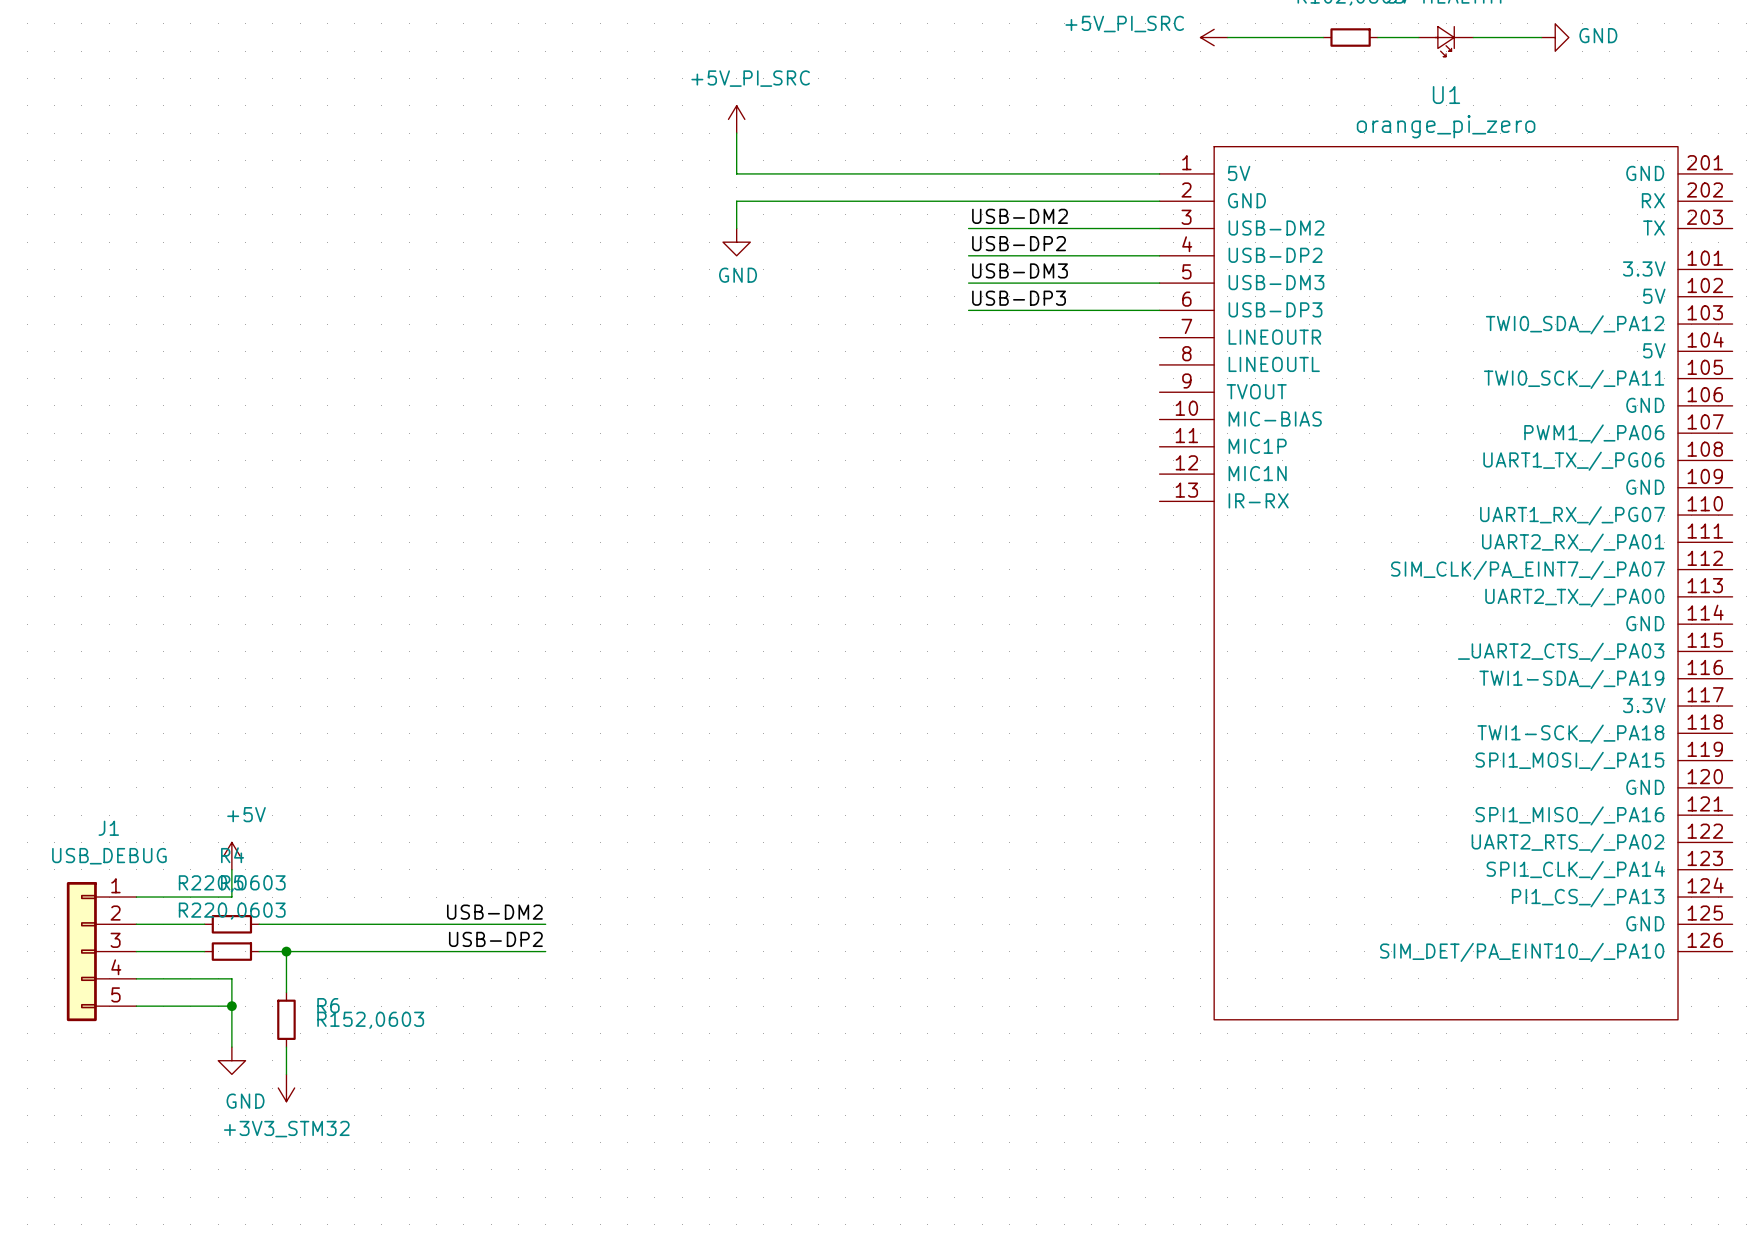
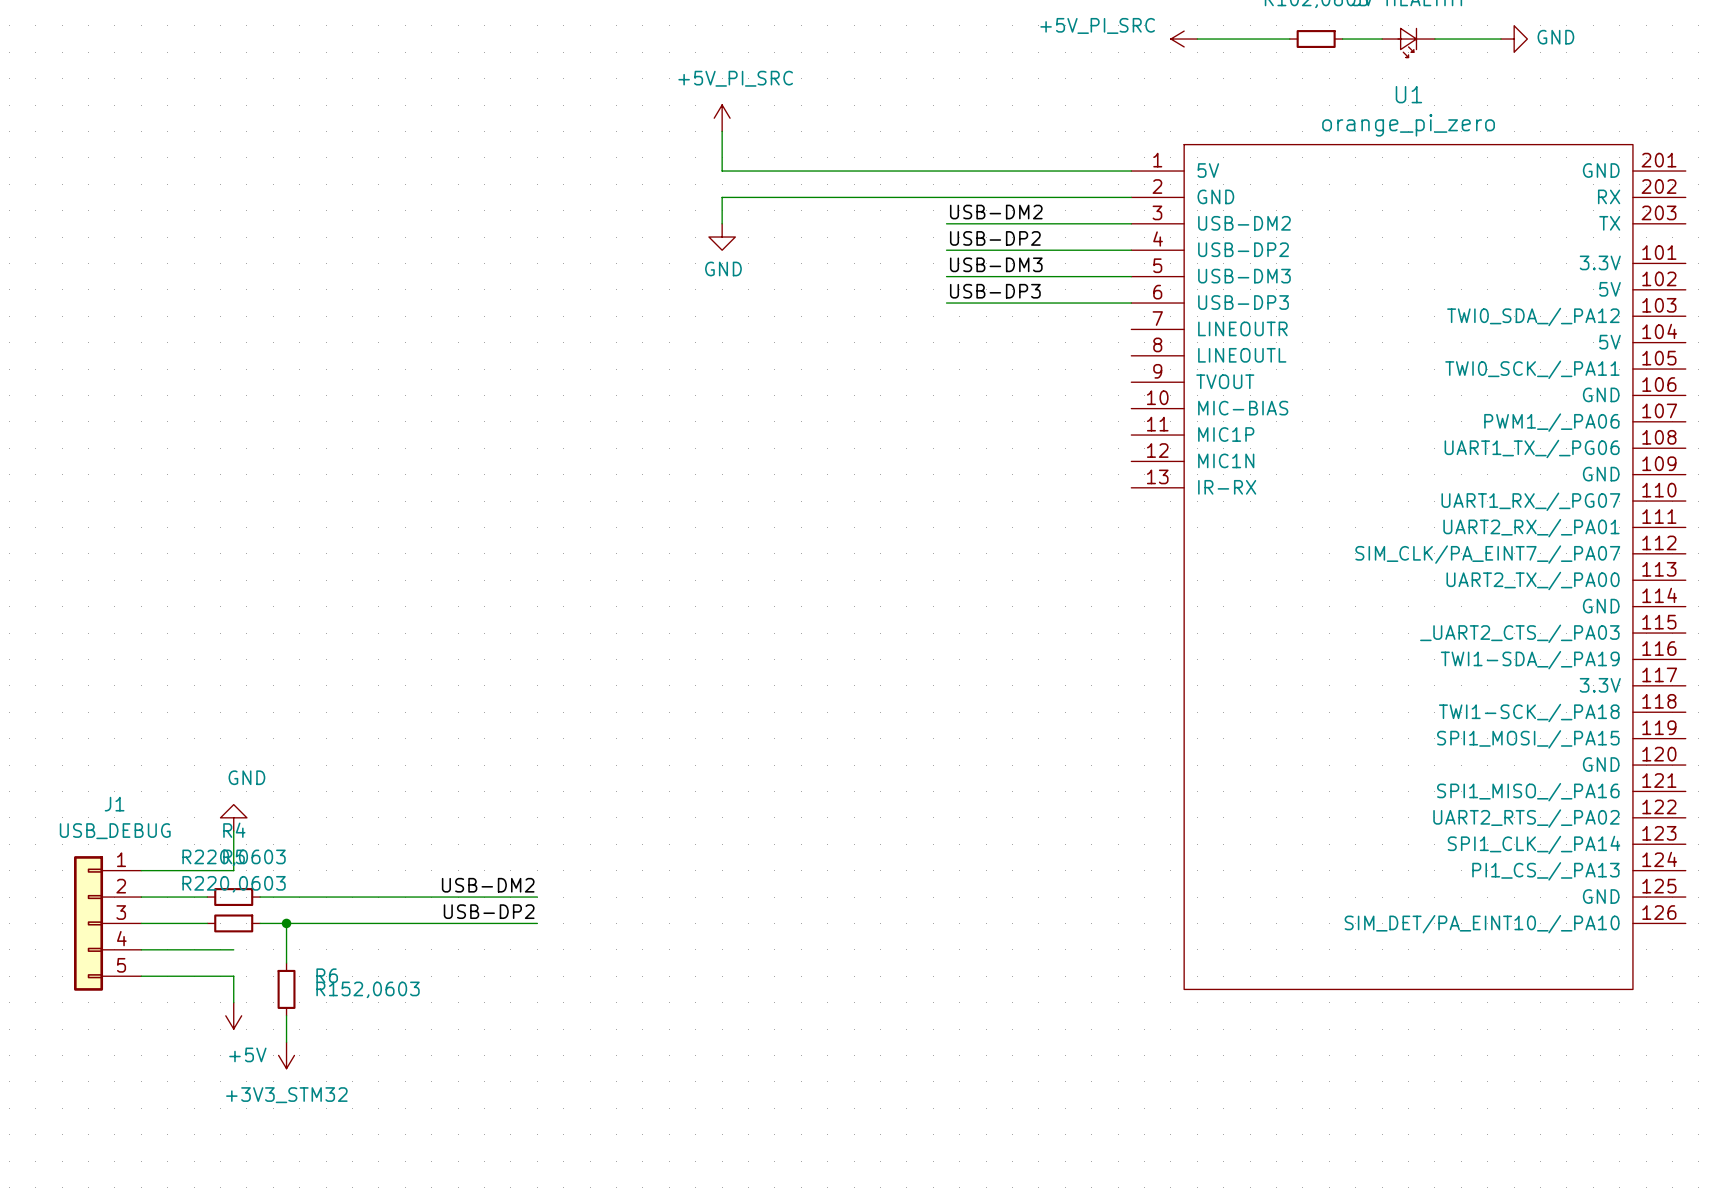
power symbol text position: +5V (246, 814) -> +5V (247, 1054)
power symbol rotation: 0° (231, 856) -> 180° (233, 1015)
power symbol position: +5V (231, 856) -> +5V (233, 1015)
wire: (231, 978) (231, 1006) -> none
junction: (231, 1006) -> none
power symbol rotation: 0° (231, 1060) -> 180° (233, 817)
power symbol position: GND (231, 1060) -> GND (233, 817)
power symbol text position: GND (245, 1101) -> GND (246, 777)

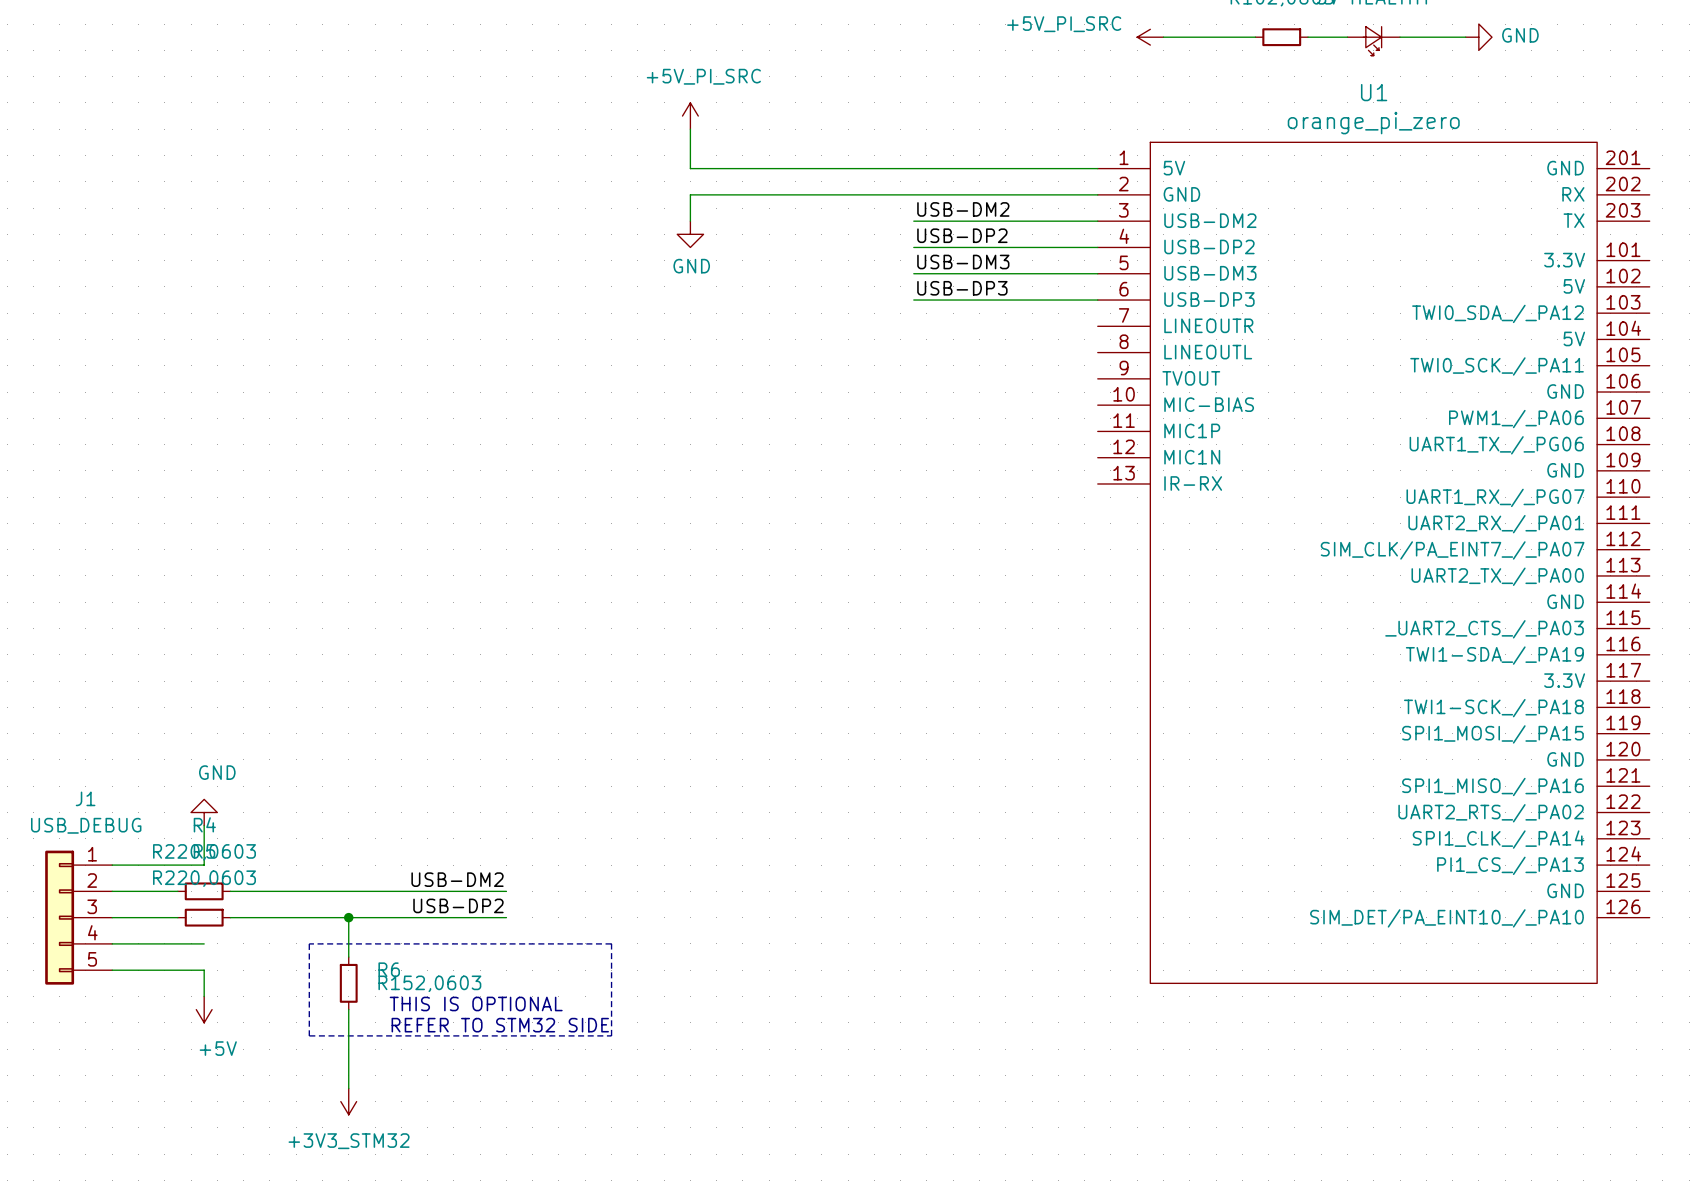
wire: (286, 923) (286, 963) -> (348, 917) (348, 957)
junction: (286, 923) -> none
junction: none -> (348, 917)
line: none -> (309, 943) (309, 1035) (611, 1035) (611, 943) (309, 943)
R6 position: (286, 989) -> (348, 983)
text: none -> THIS IS OPTIONAL (476, 1003)
wire: (286, 1015) (286, 1042) -> none
wire: none -> (348, 1009) (348, 1088)
text: none -> REFER TO STM32 SIDE (500, 1025)
power symbol position: +3V3_STM32 (286, 1055) -> +3V3_STM32 (348, 1101)

